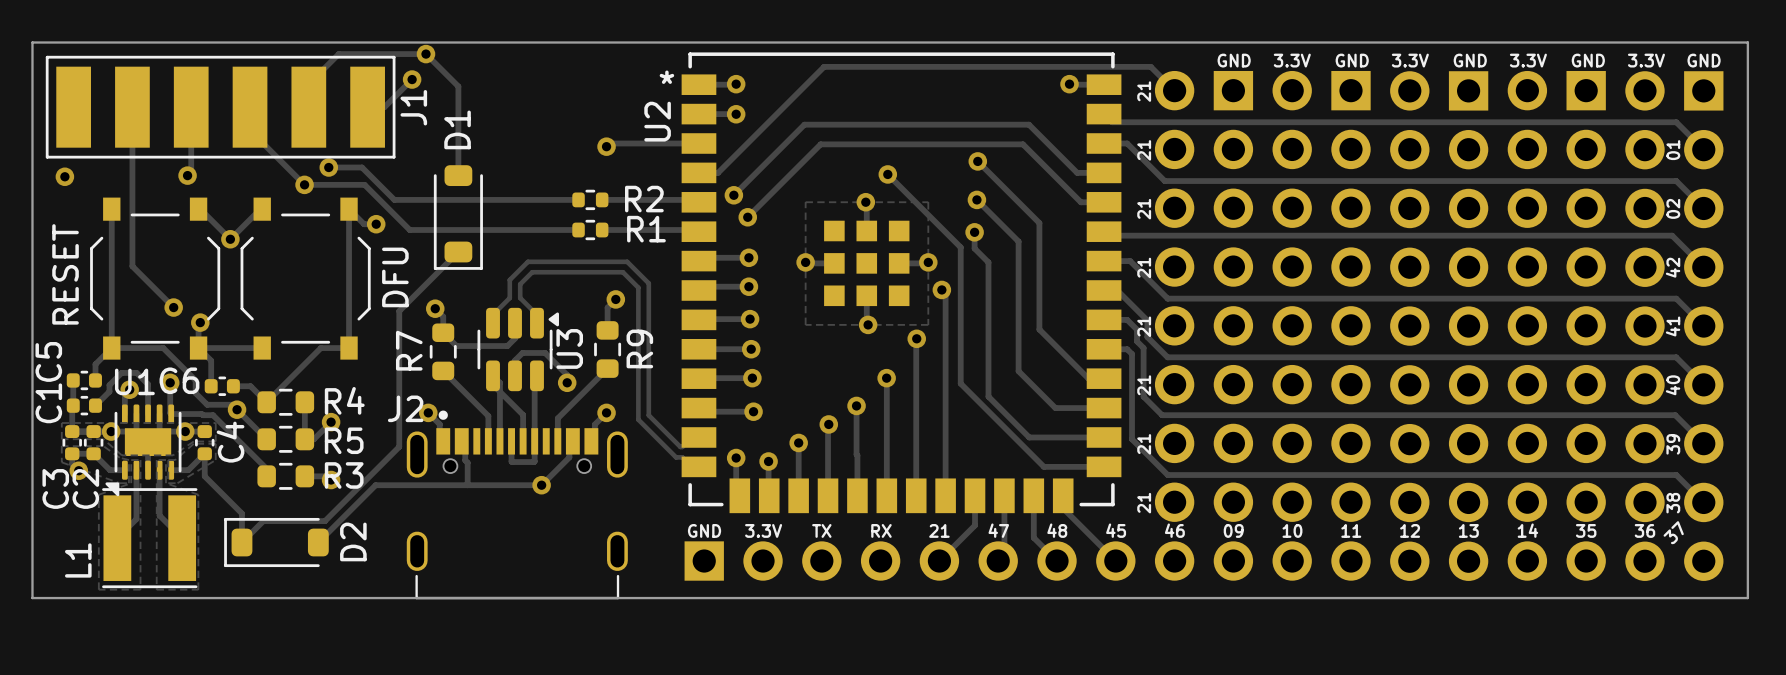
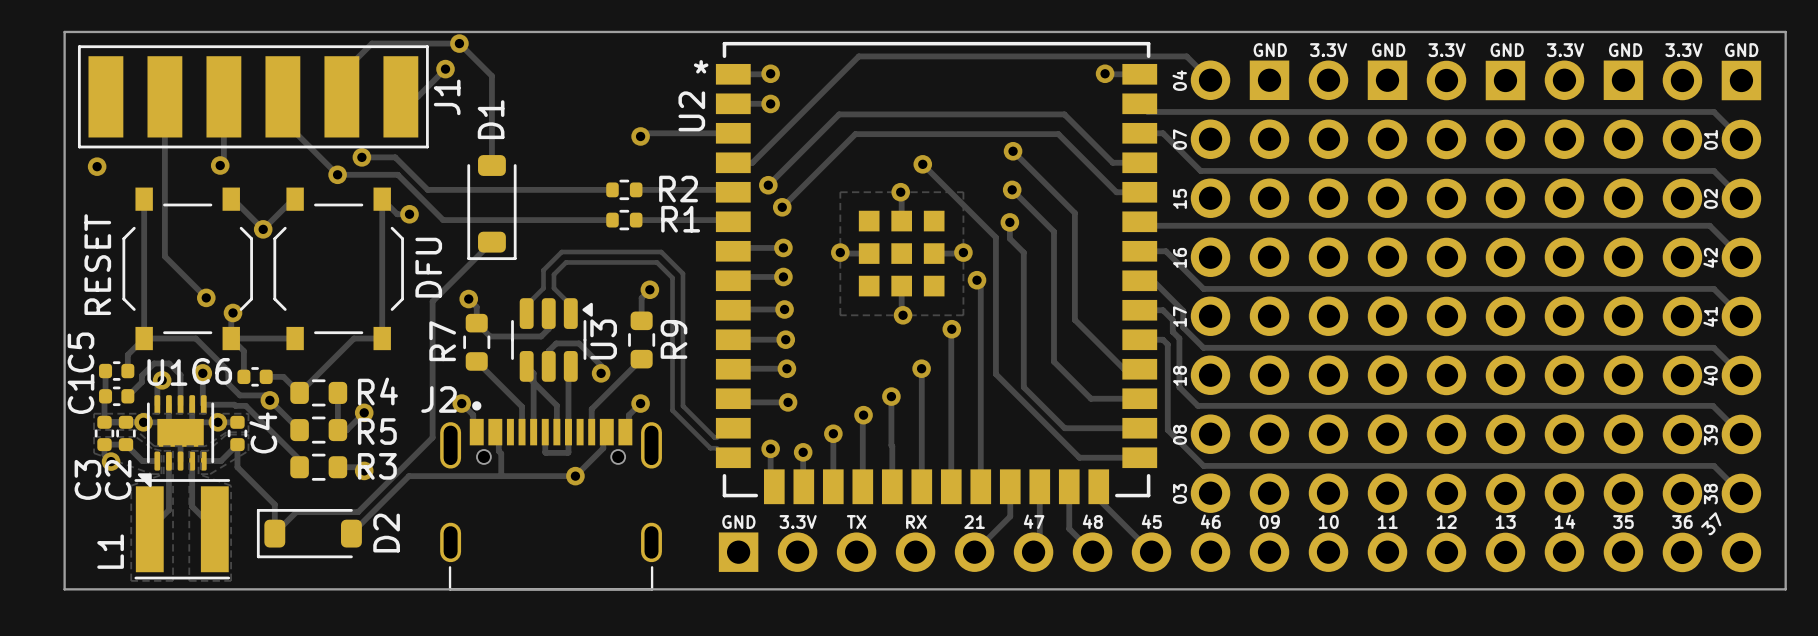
text: 21 (1144, 91) -> 04 (1179, 80)
text: 21 (1144, 150) -> 07 (1179, 139)
text: 21 (1144, 209) -> 15 (1179, 198)
text: 21 (1144, 267) -> 16 (1179, 257)
text: 21 (1144, 326) -> 17 (1179, 316)
text: 21 (1144, 385) -> 18 (1179, 375)
text: 21 (1144, 444) -> 08 (1179, 434)
text: 21 (1144, 503) -> 03 (1179, 493)

